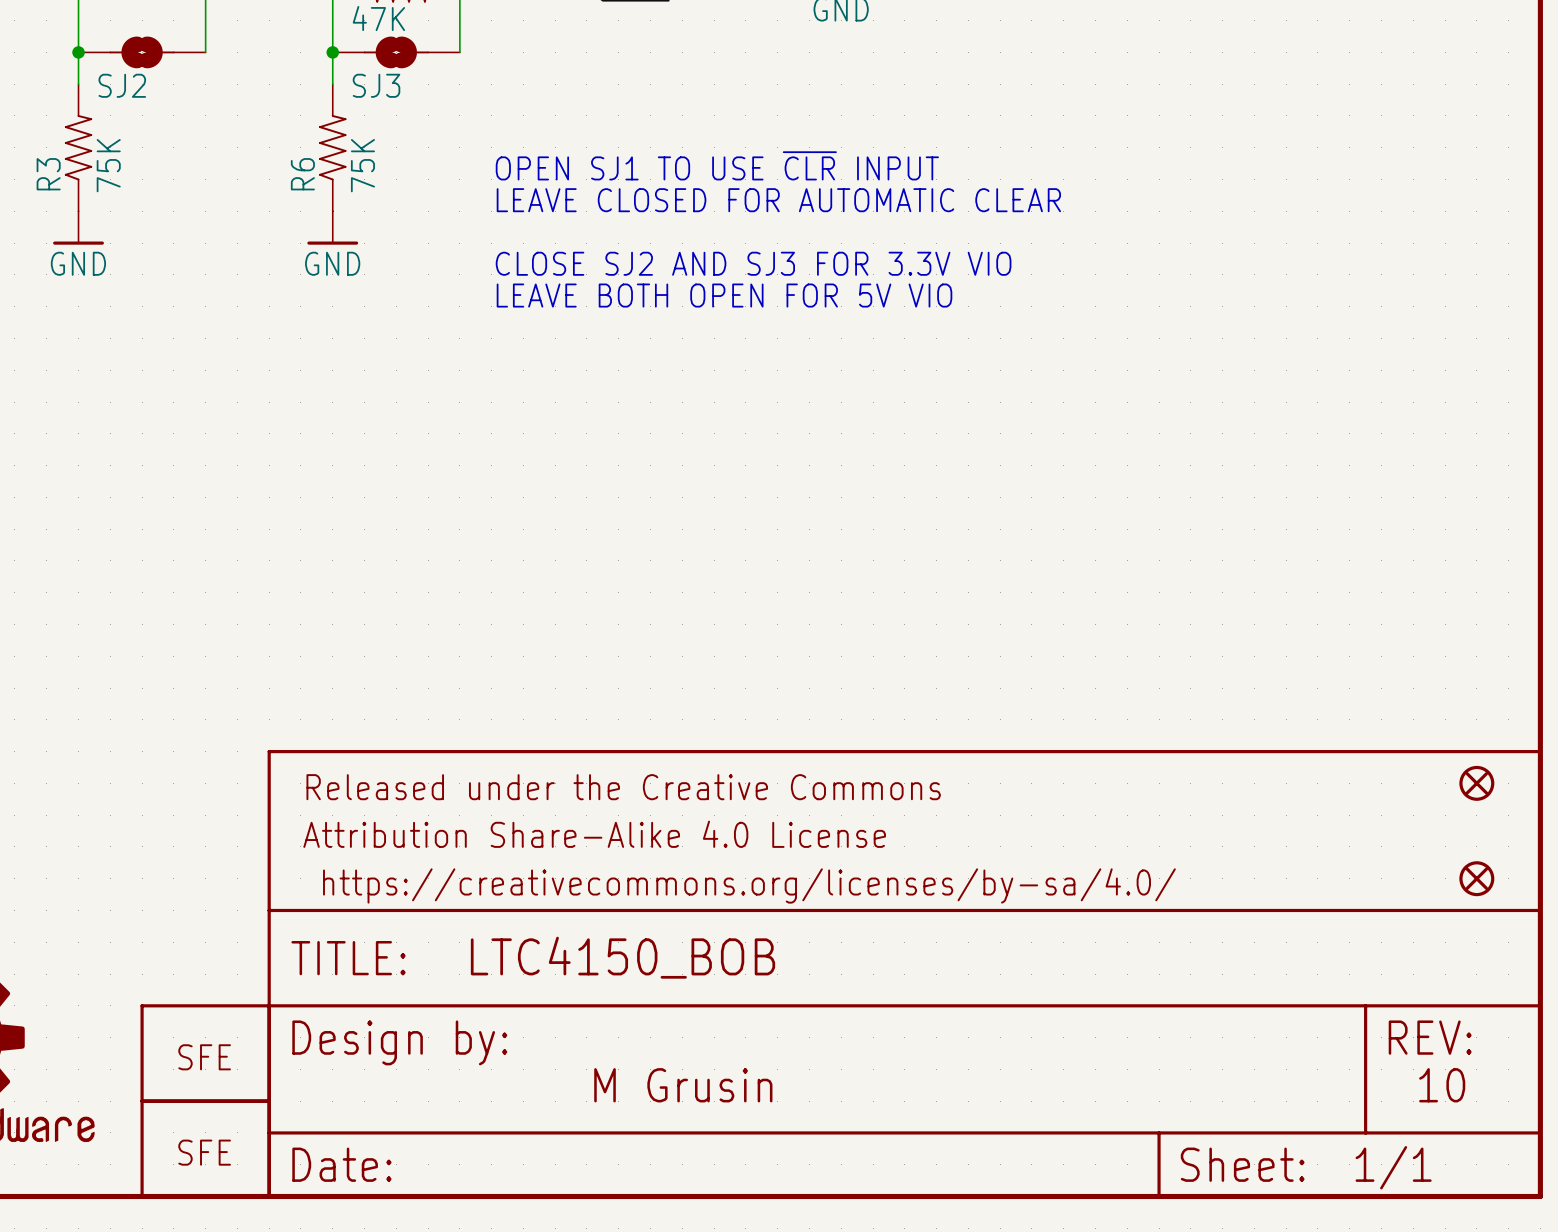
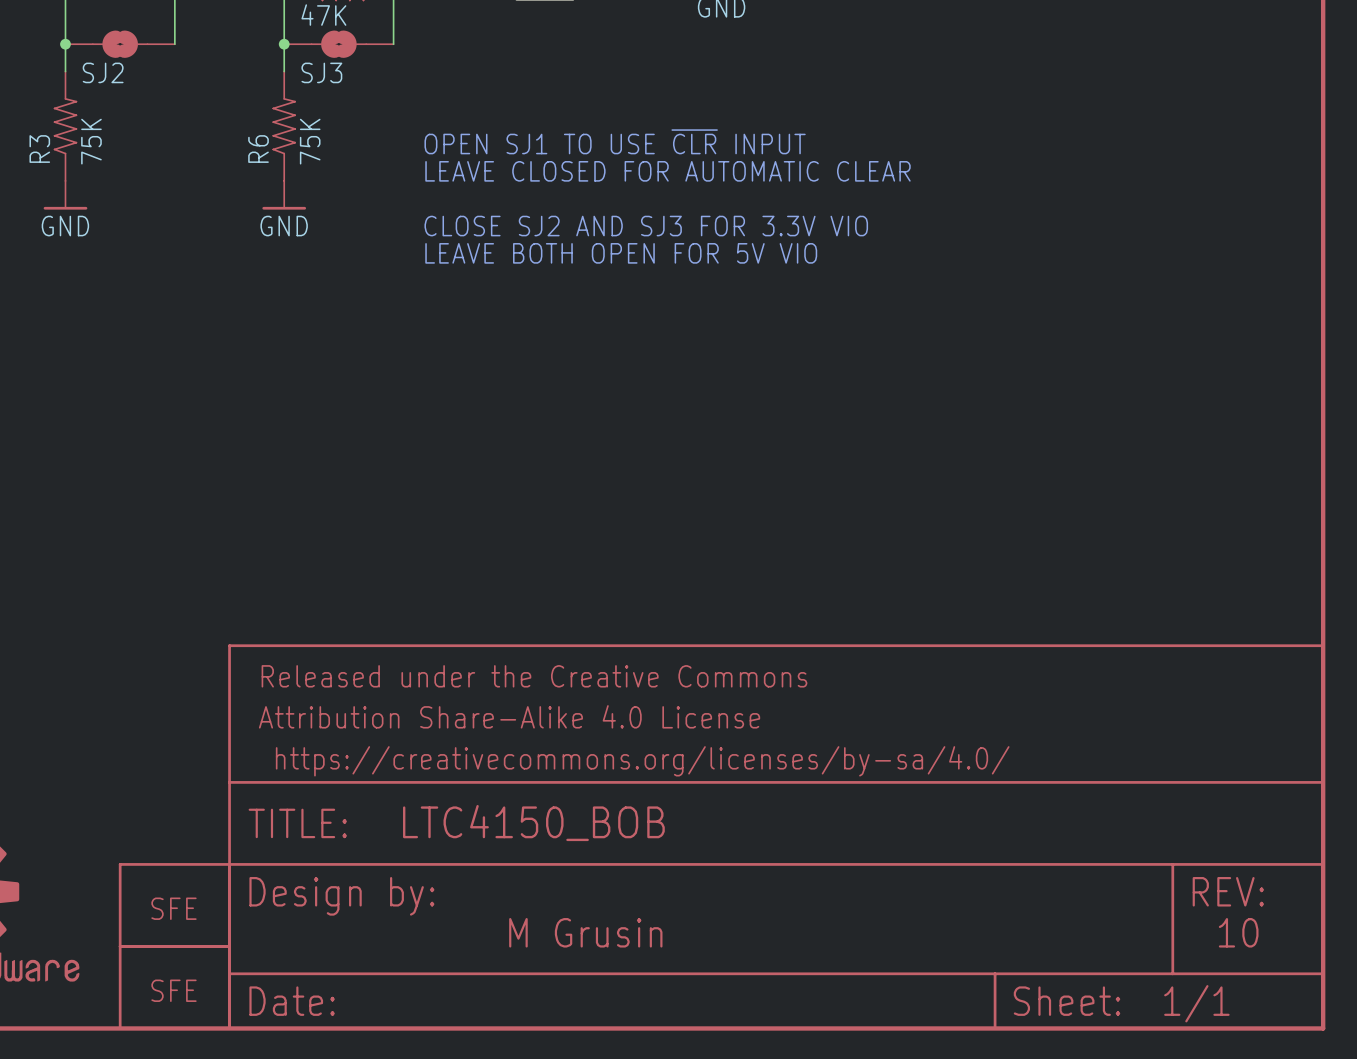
part: (1476, 783) -> none
part: (1476, 878) -> none

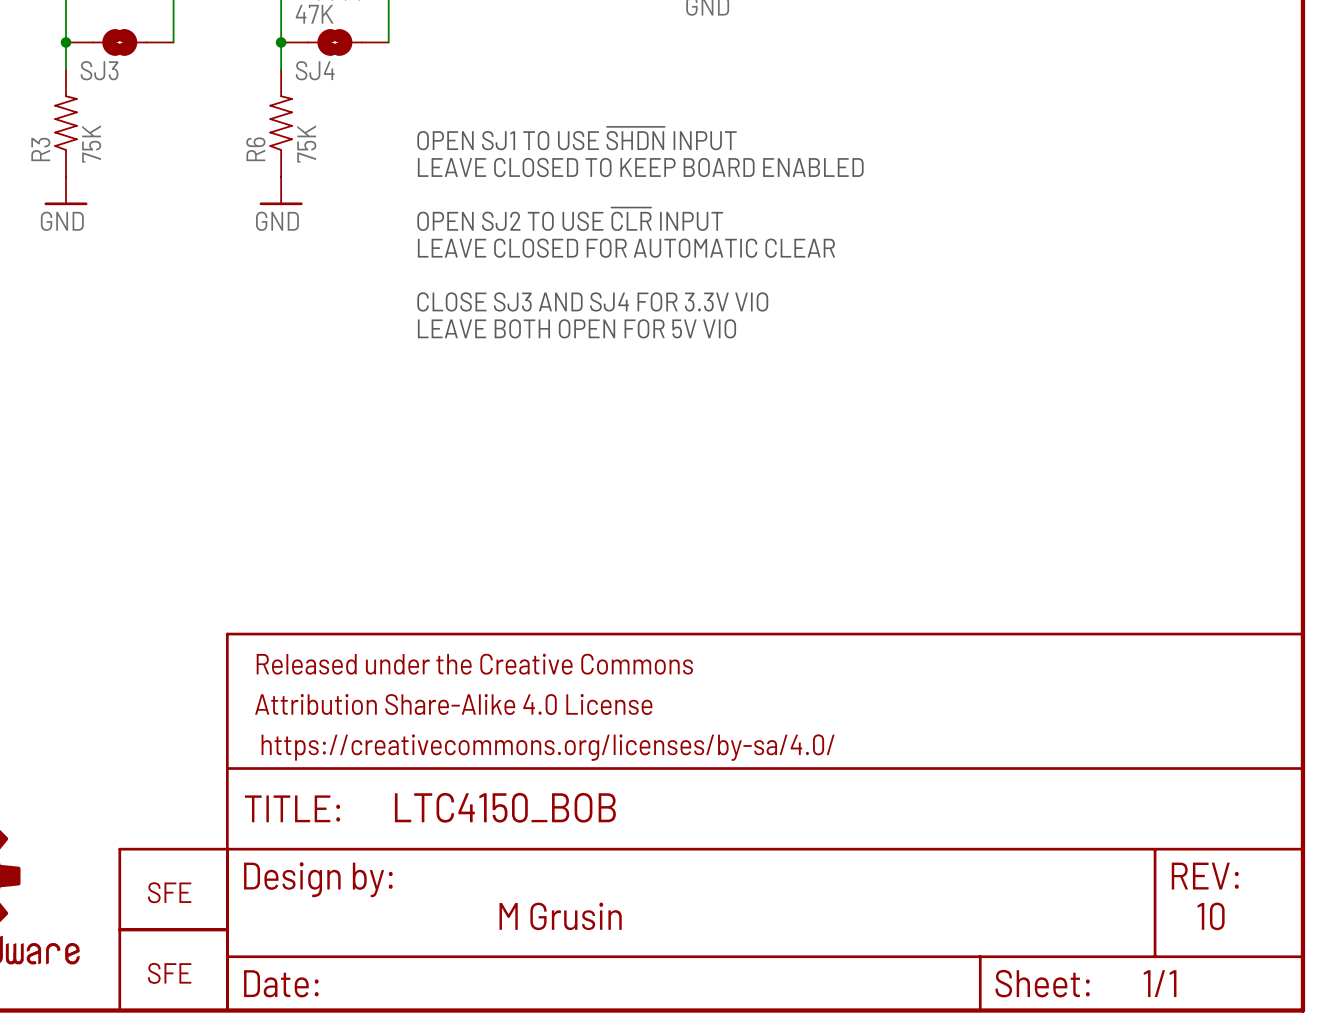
SJ2 name: SJ2 (103, 72) -> SJ3 (99, 70)
SJ3 name: SJ3 (321, 72) -> SJ4 (315, 70)
text: OPEN SJ1 TO USE ~{CLR} INPUT (615, 141) -> OPEN SJ1 TO USE ~{SHDN} INPUT (576, 138)
text: LEAVE CLOSED FOR AUTOMATIC CLEAR (667, 171) -> LEAVE CLOSED TO KEEP BOARD ENABLED (640, 167)
text: CLOSE SJ2 AND SJ3 FOR 3.3V VIO (646, 226) -> OPEN SJ2 TO USE ~{CLR} INPUT (570, 219)
text: LEAVE BOTH OPEN FOR 5V VIO (621, 253) -> LEAVE CLOSED FOR AUTOMATIC CLEAR (626, 248)
text: none -> CLOSE SJ3 AND SJ4 FOR 3.3V VIO (592, 301)
text: none -> LEAVE BOTH OPEN FOR 5V VIO (576, 328)

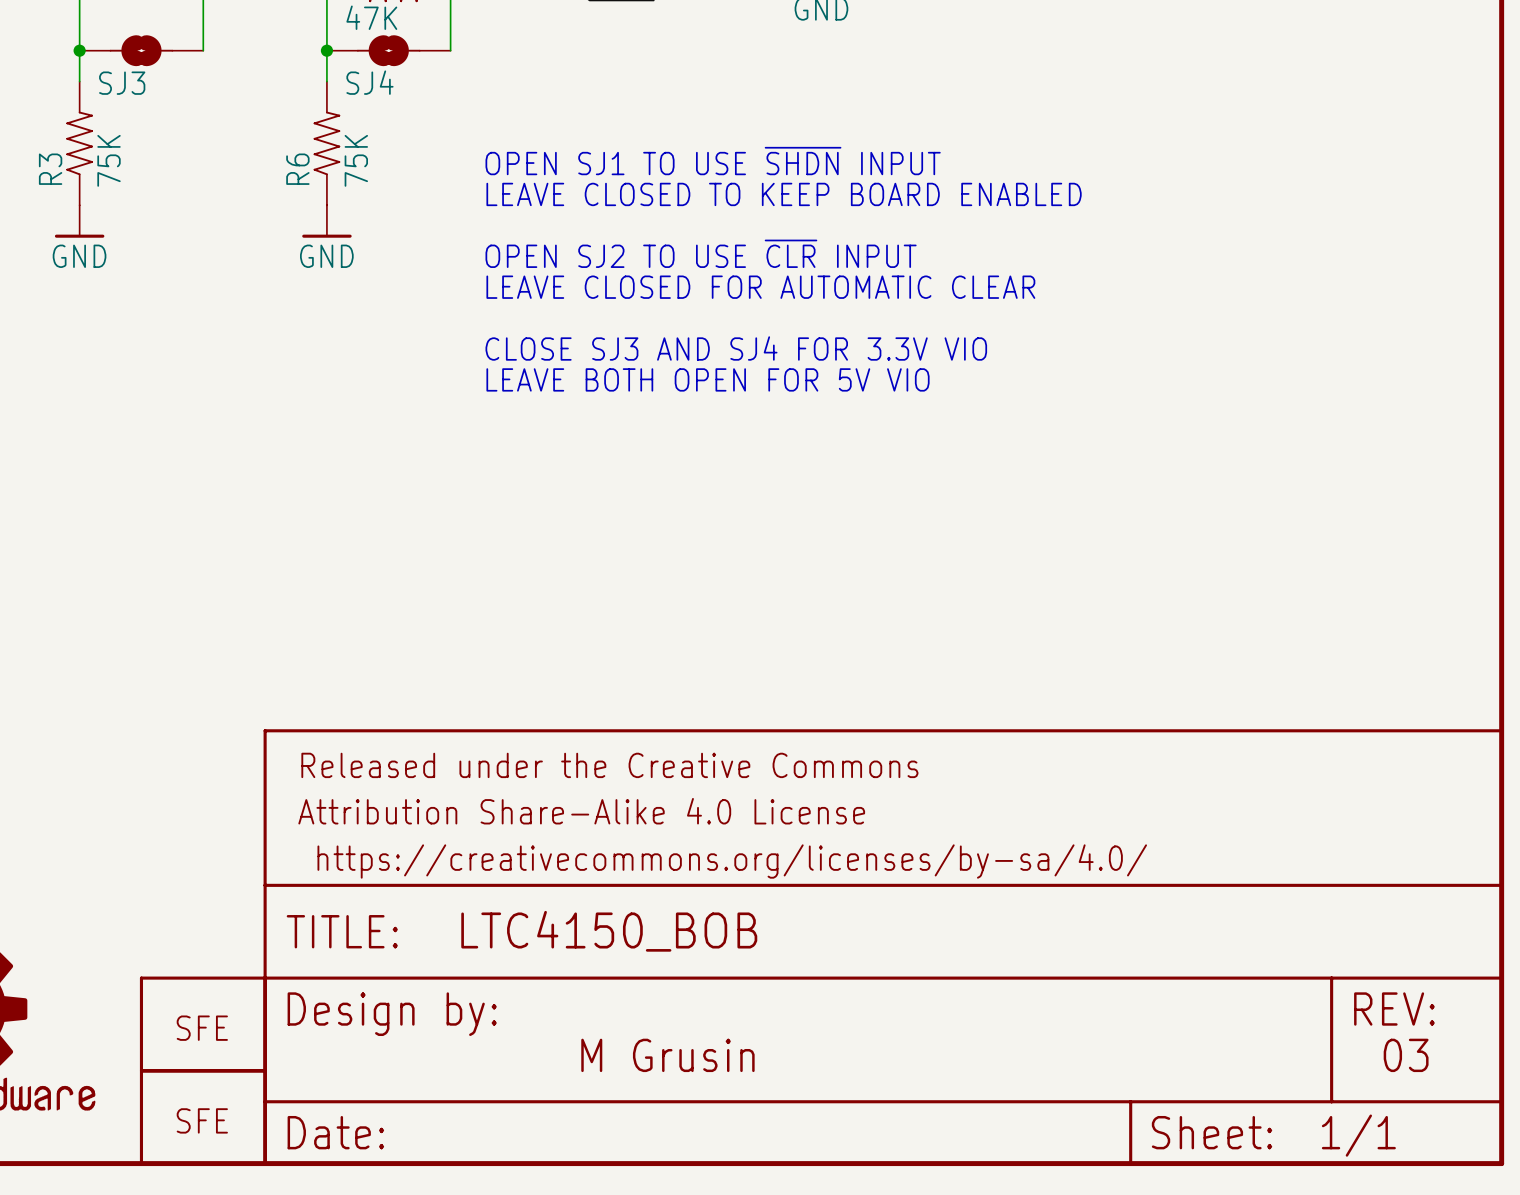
text: 10 (1211, 916) -> 03 (1406, 1055)

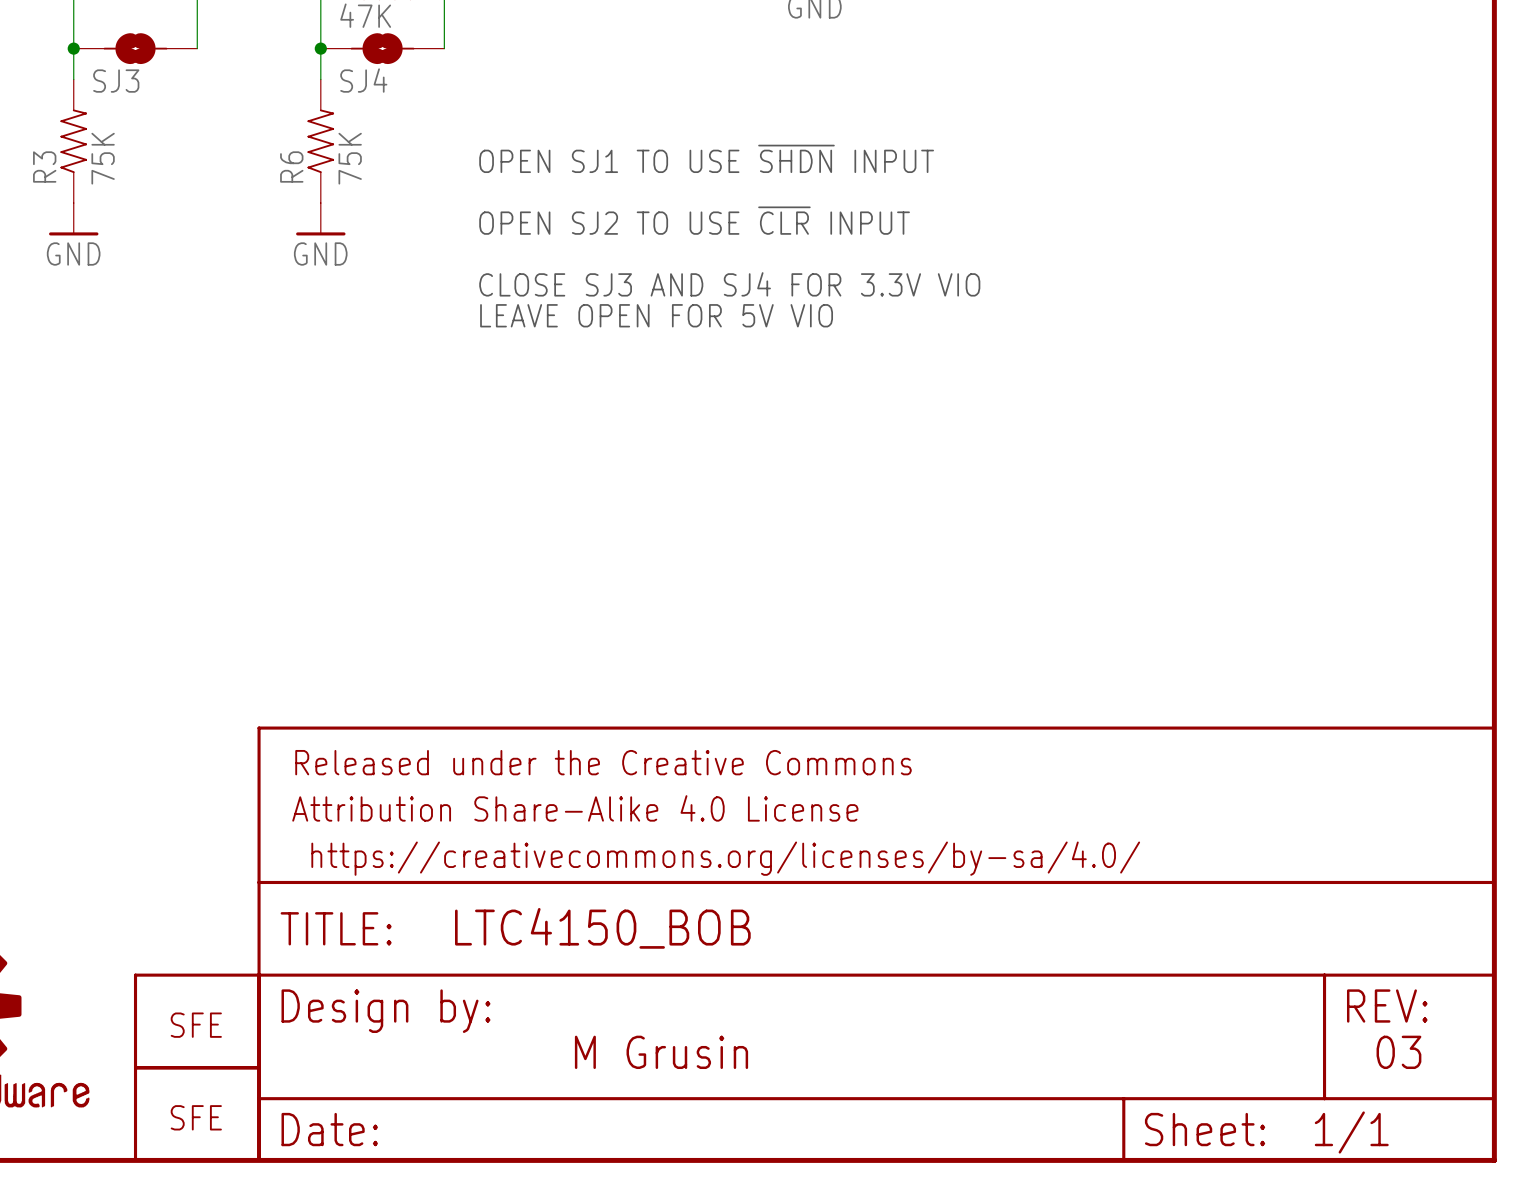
text: LEAVE CLOSED TO KEEP BOARD ENABLED (784, 194) -> none
text position: OPEN SJ2 TO USE ~{CLR} INPUT (701, 253) -> OPEN SJ2 TO USE ~{CLR} INPUT (694, 220)
text: LEAVE CLOSED FOR AUTOMATIC CLEAR (760, 287) -> CLOSE SJ3 AND SJ4 FOR 3.3V VIO (729, 284)
text: none -> LEAVE OPEN FOR 5V VIO (656, 315)
text: CLOSE SJ3 AND SJ4 FOR 3.3V VIO (736, 348) -> none
text: LEAVE BOTH OPEN FOR 5V VIO (708, 379) -> none

